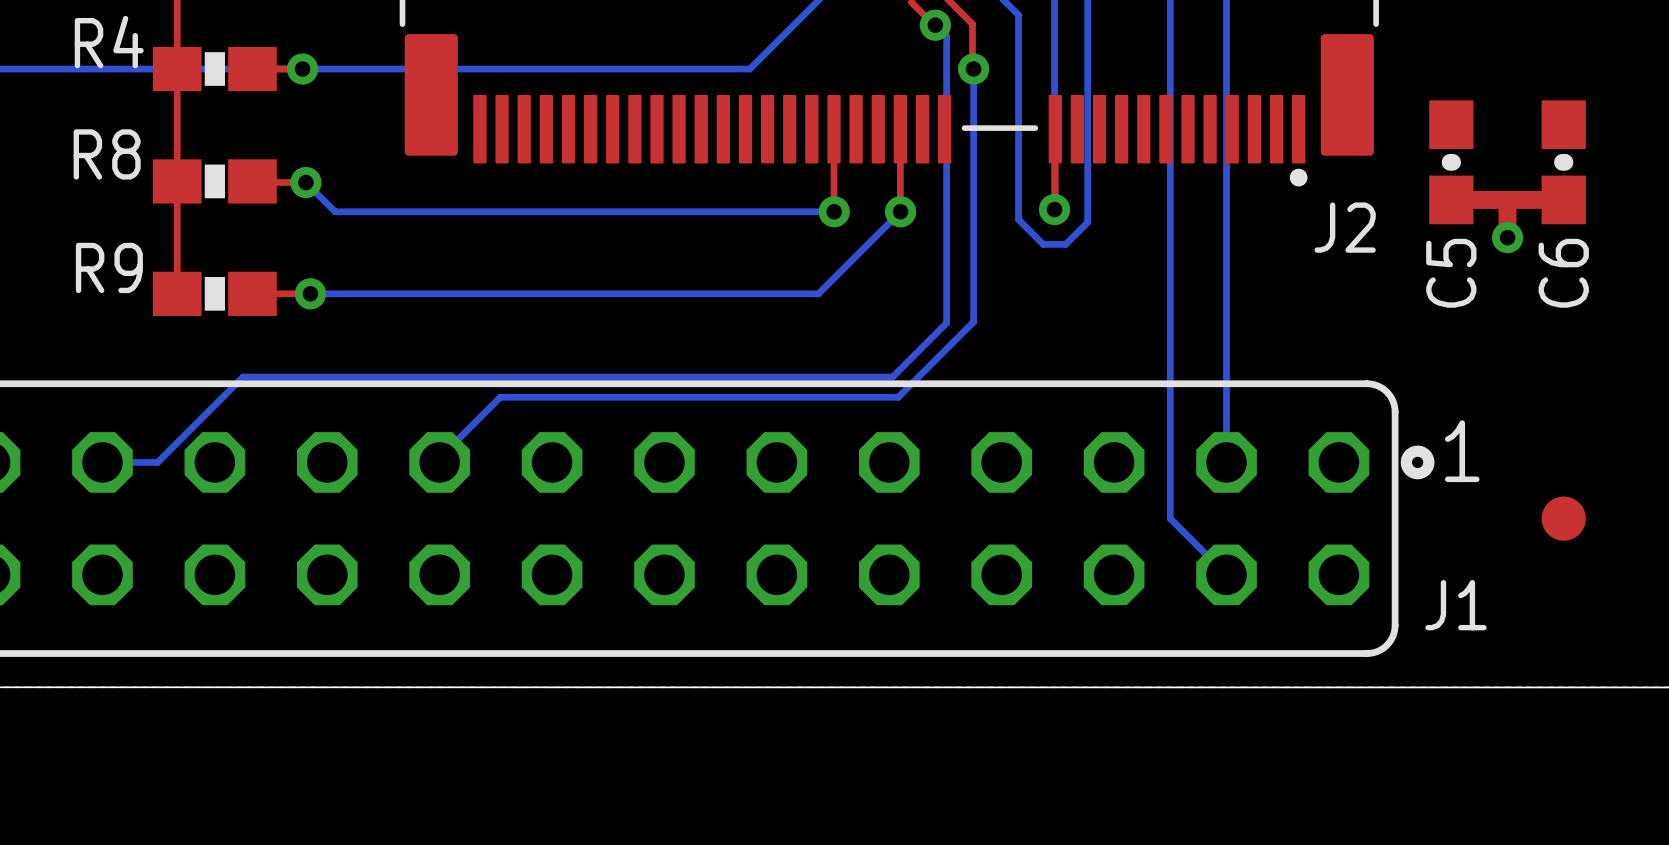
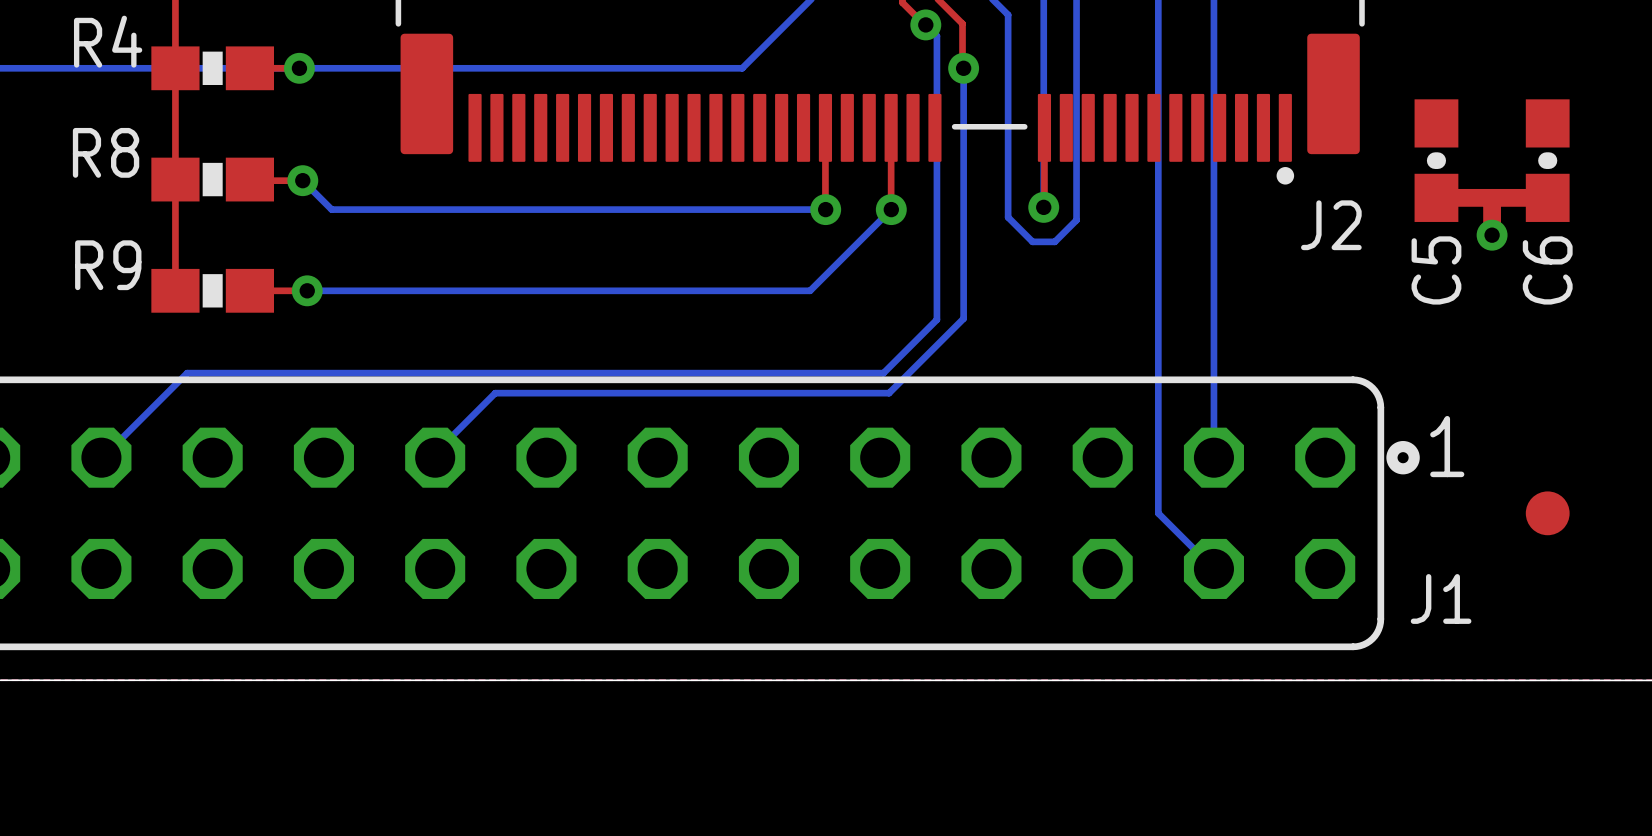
bottom track: (243, 377) (157, 462) (103, 462) -> (240, 373) (187, 373) (102, 457)

